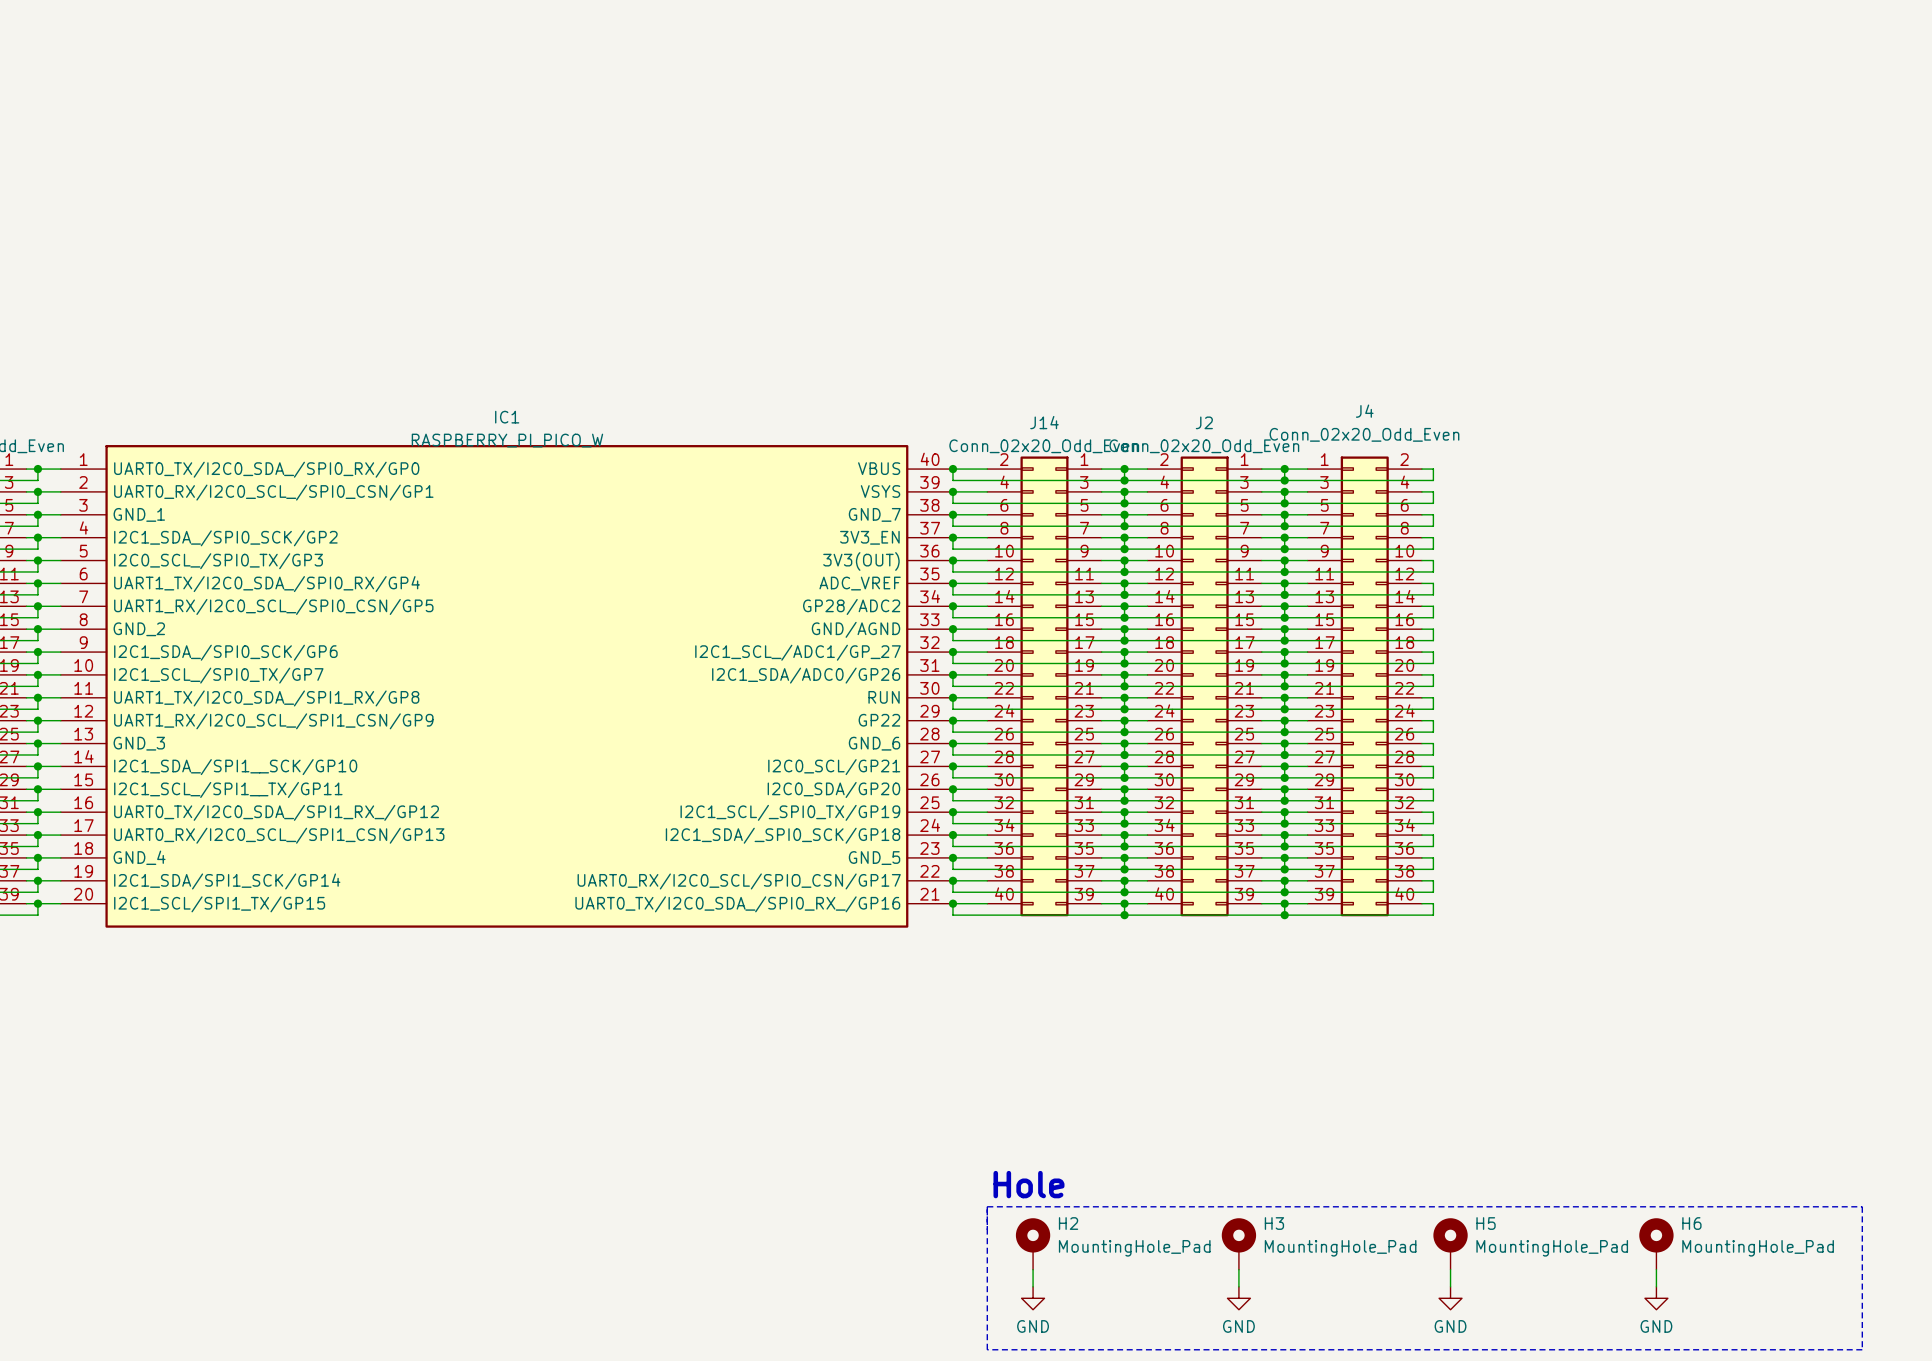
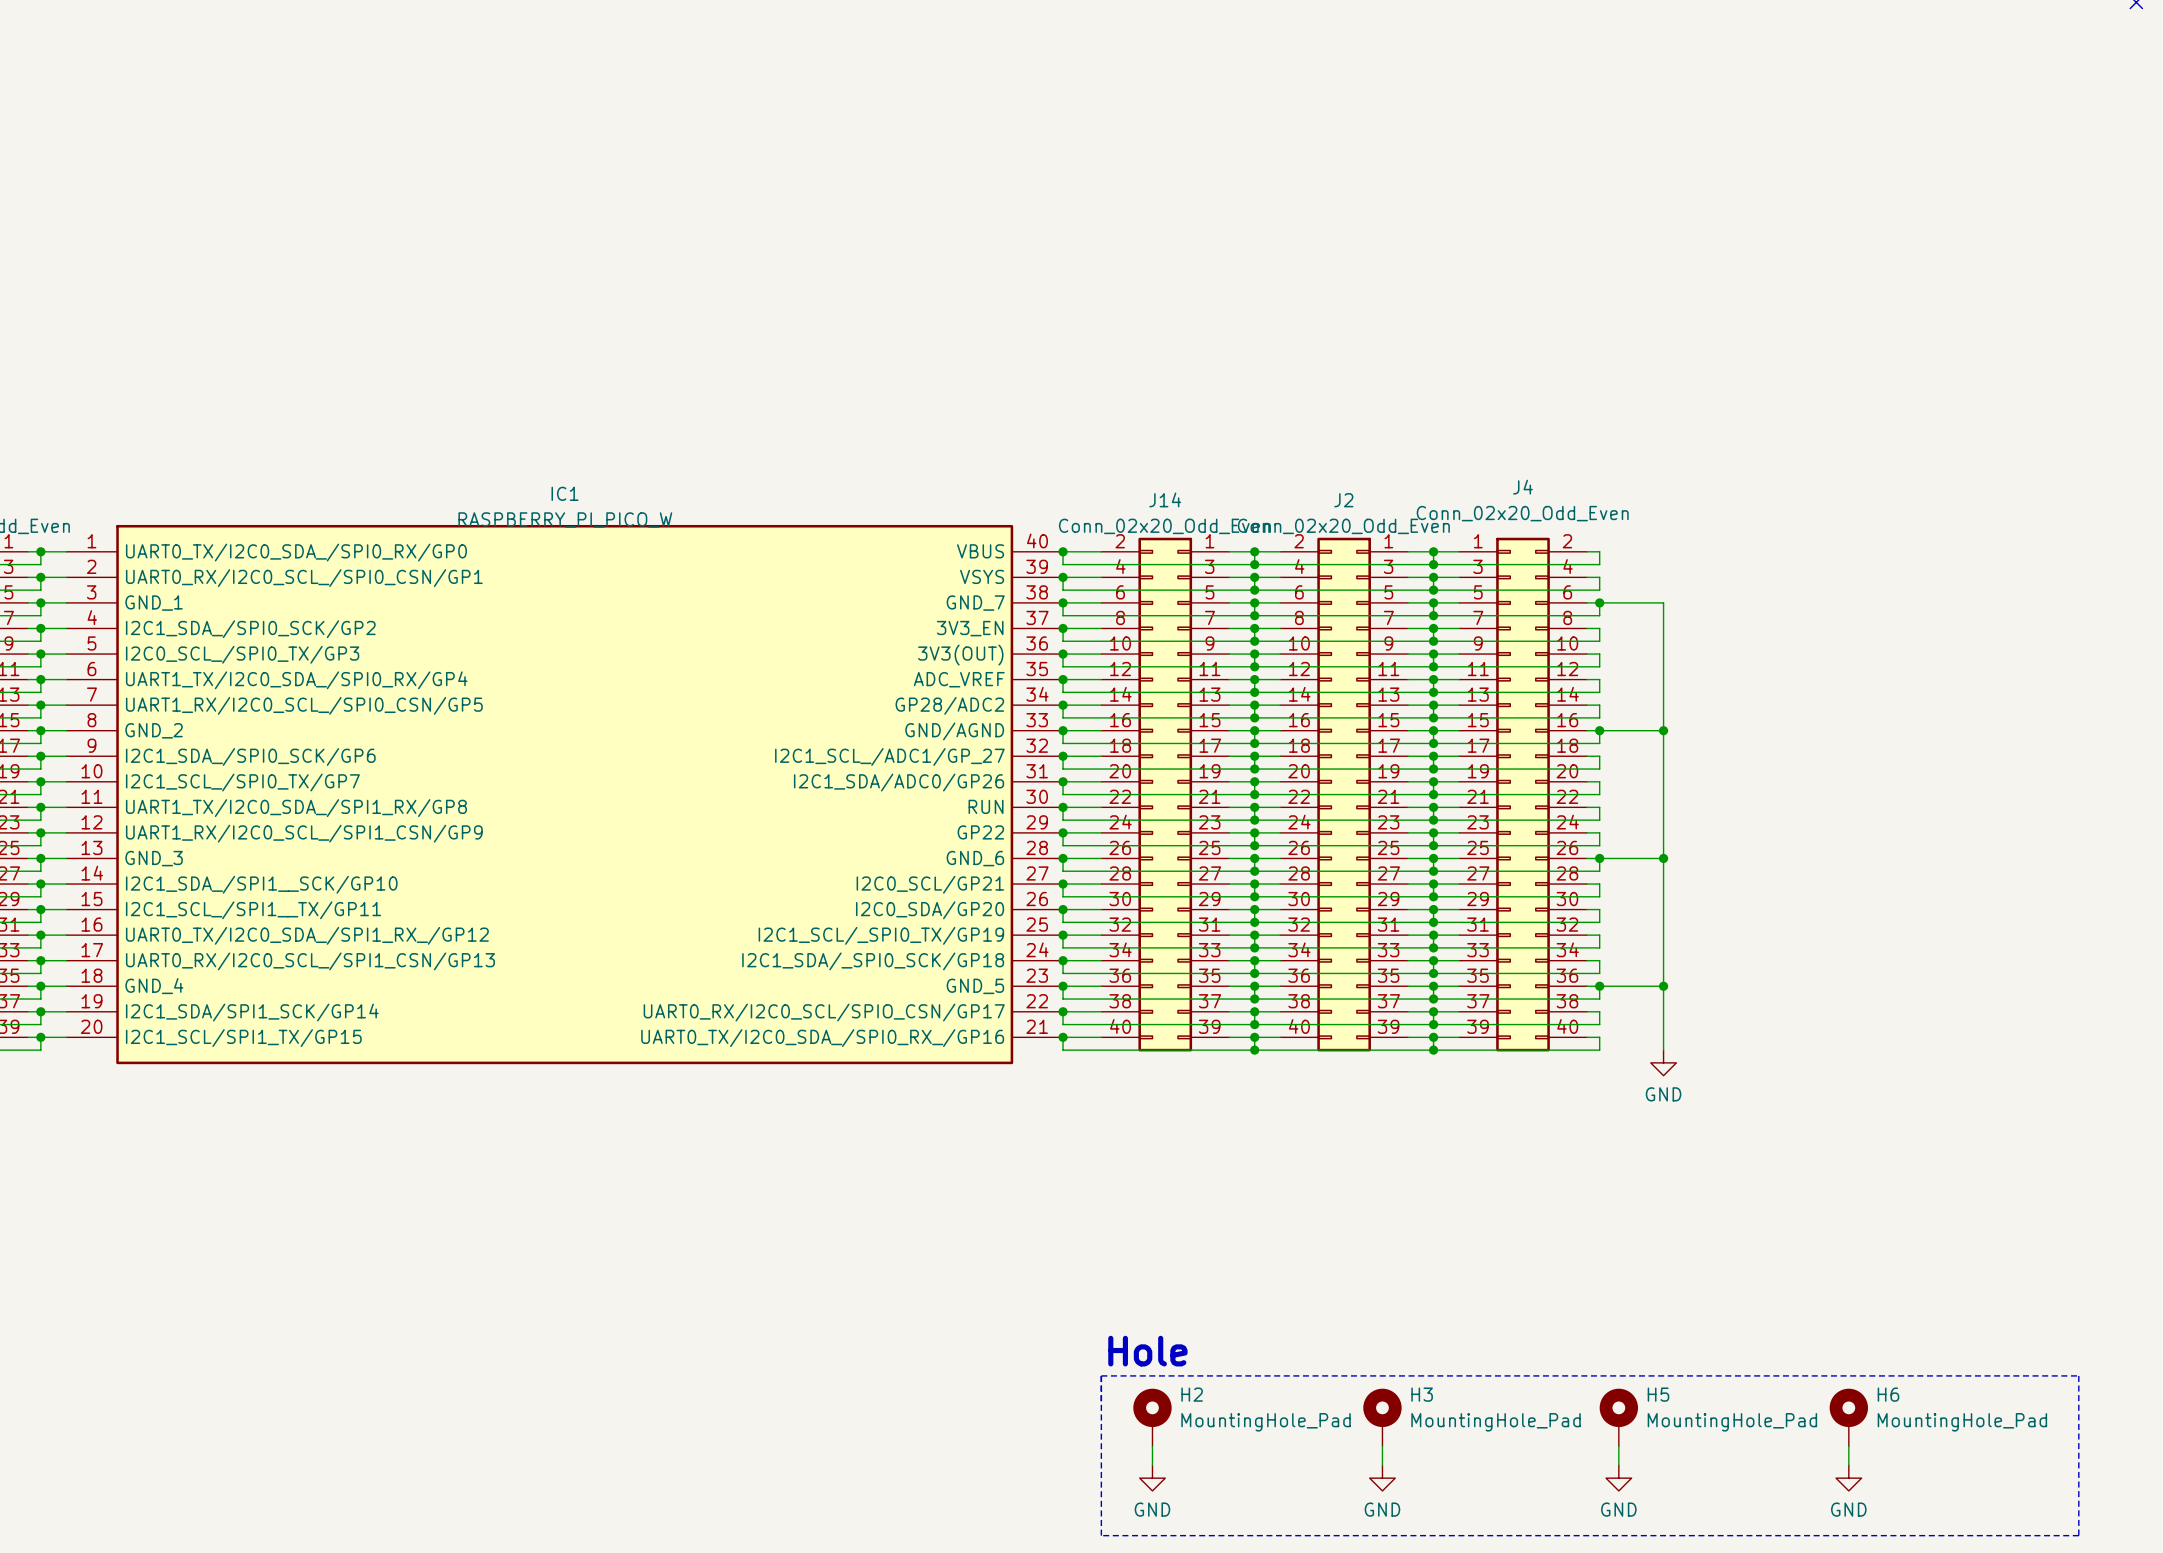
wire: none -> (1599, 602) (1663, 602) (1663, 1050)
junction: none -> (1599, 602)
wire: none -> (1599, 730) (1663, 730)
junction: none -> (1599, 730)
junction: none -> (1663, 730)
wire: none -> (1599, 858) (1663, 858)
junction: none -> (1599, 858)
junction: none -> (1663, 858)
wire: none -> (1599, 986) (1663, 986)
junction: none -> (1599, 986)
junction: none -> (1663, 986)
power symbol: none -> GND (1663, 1062)

